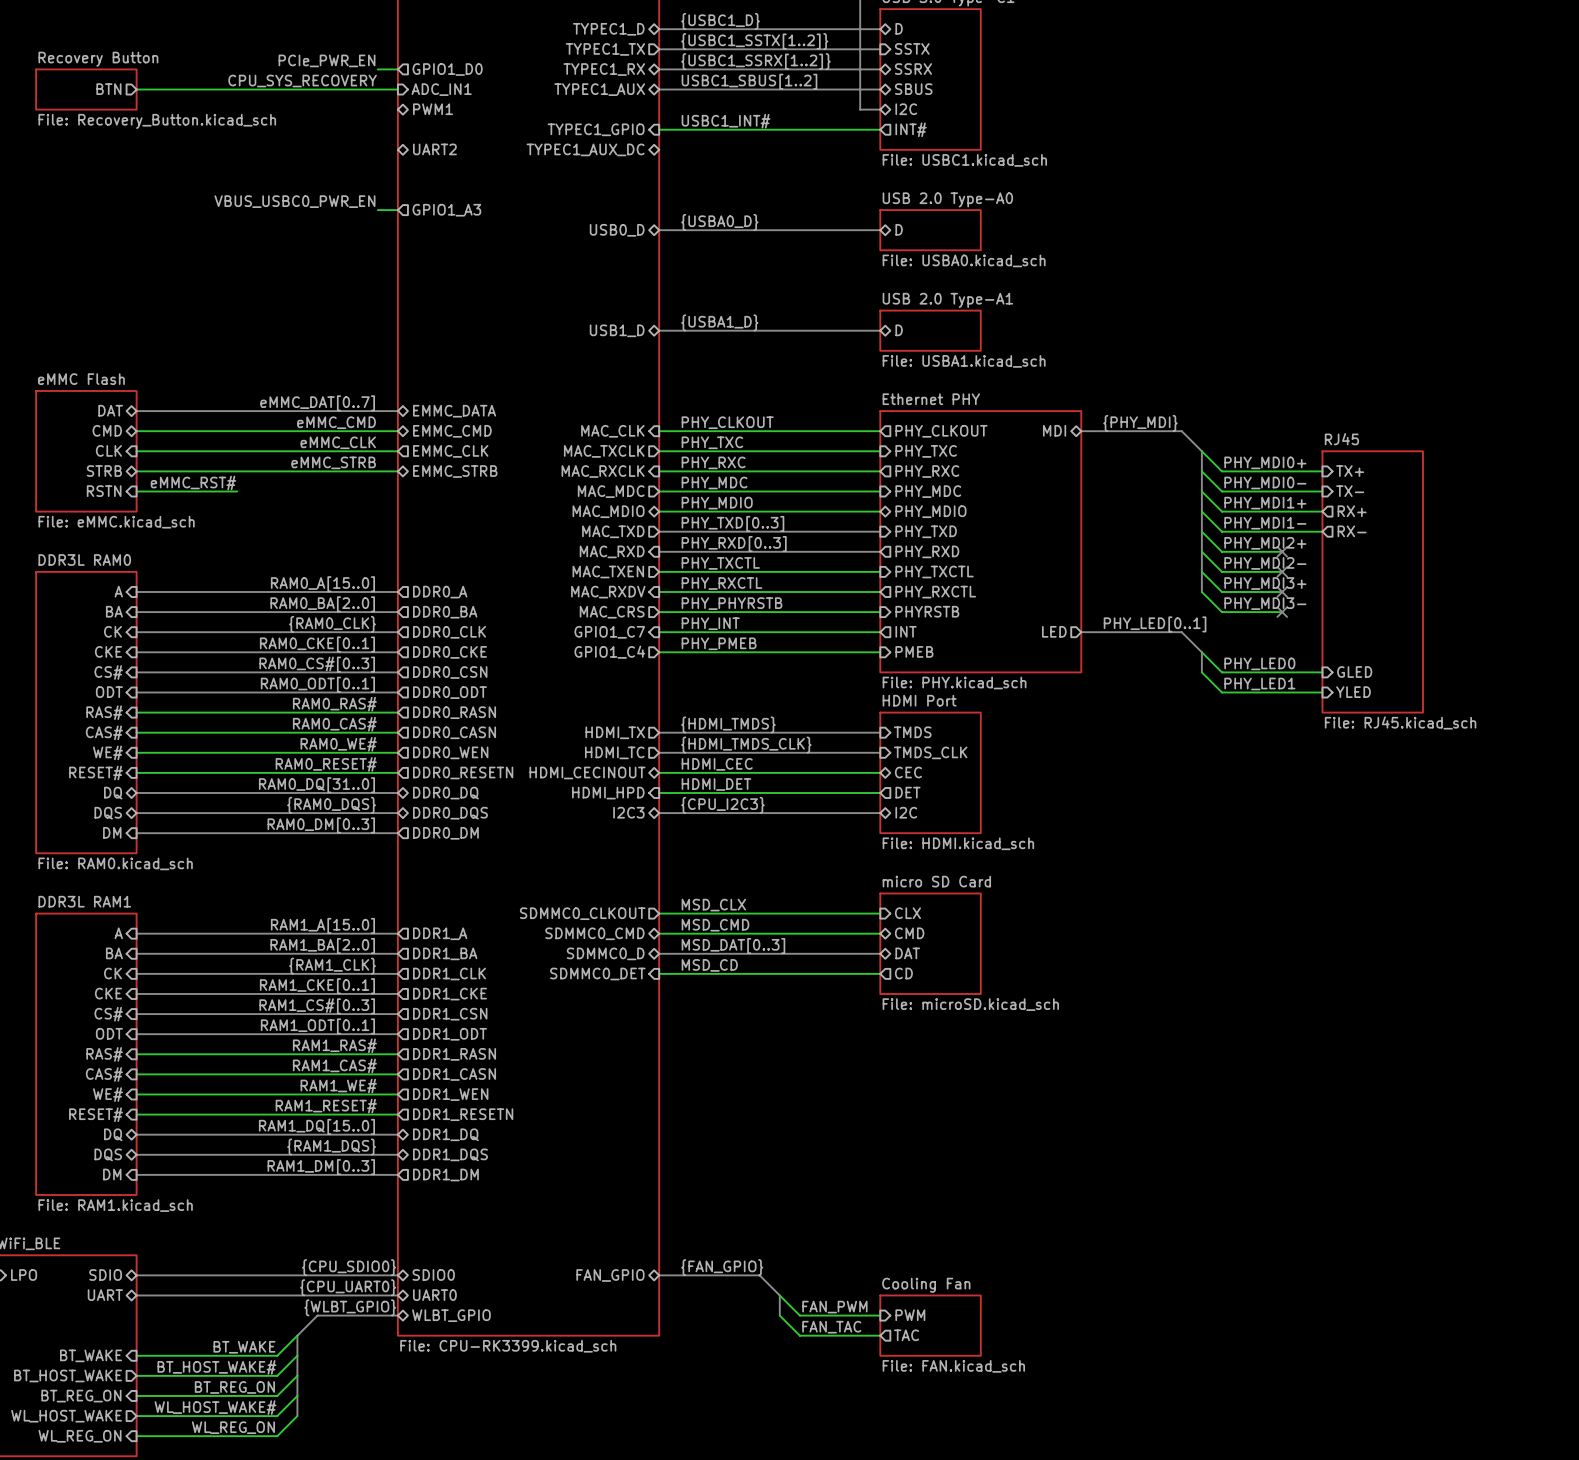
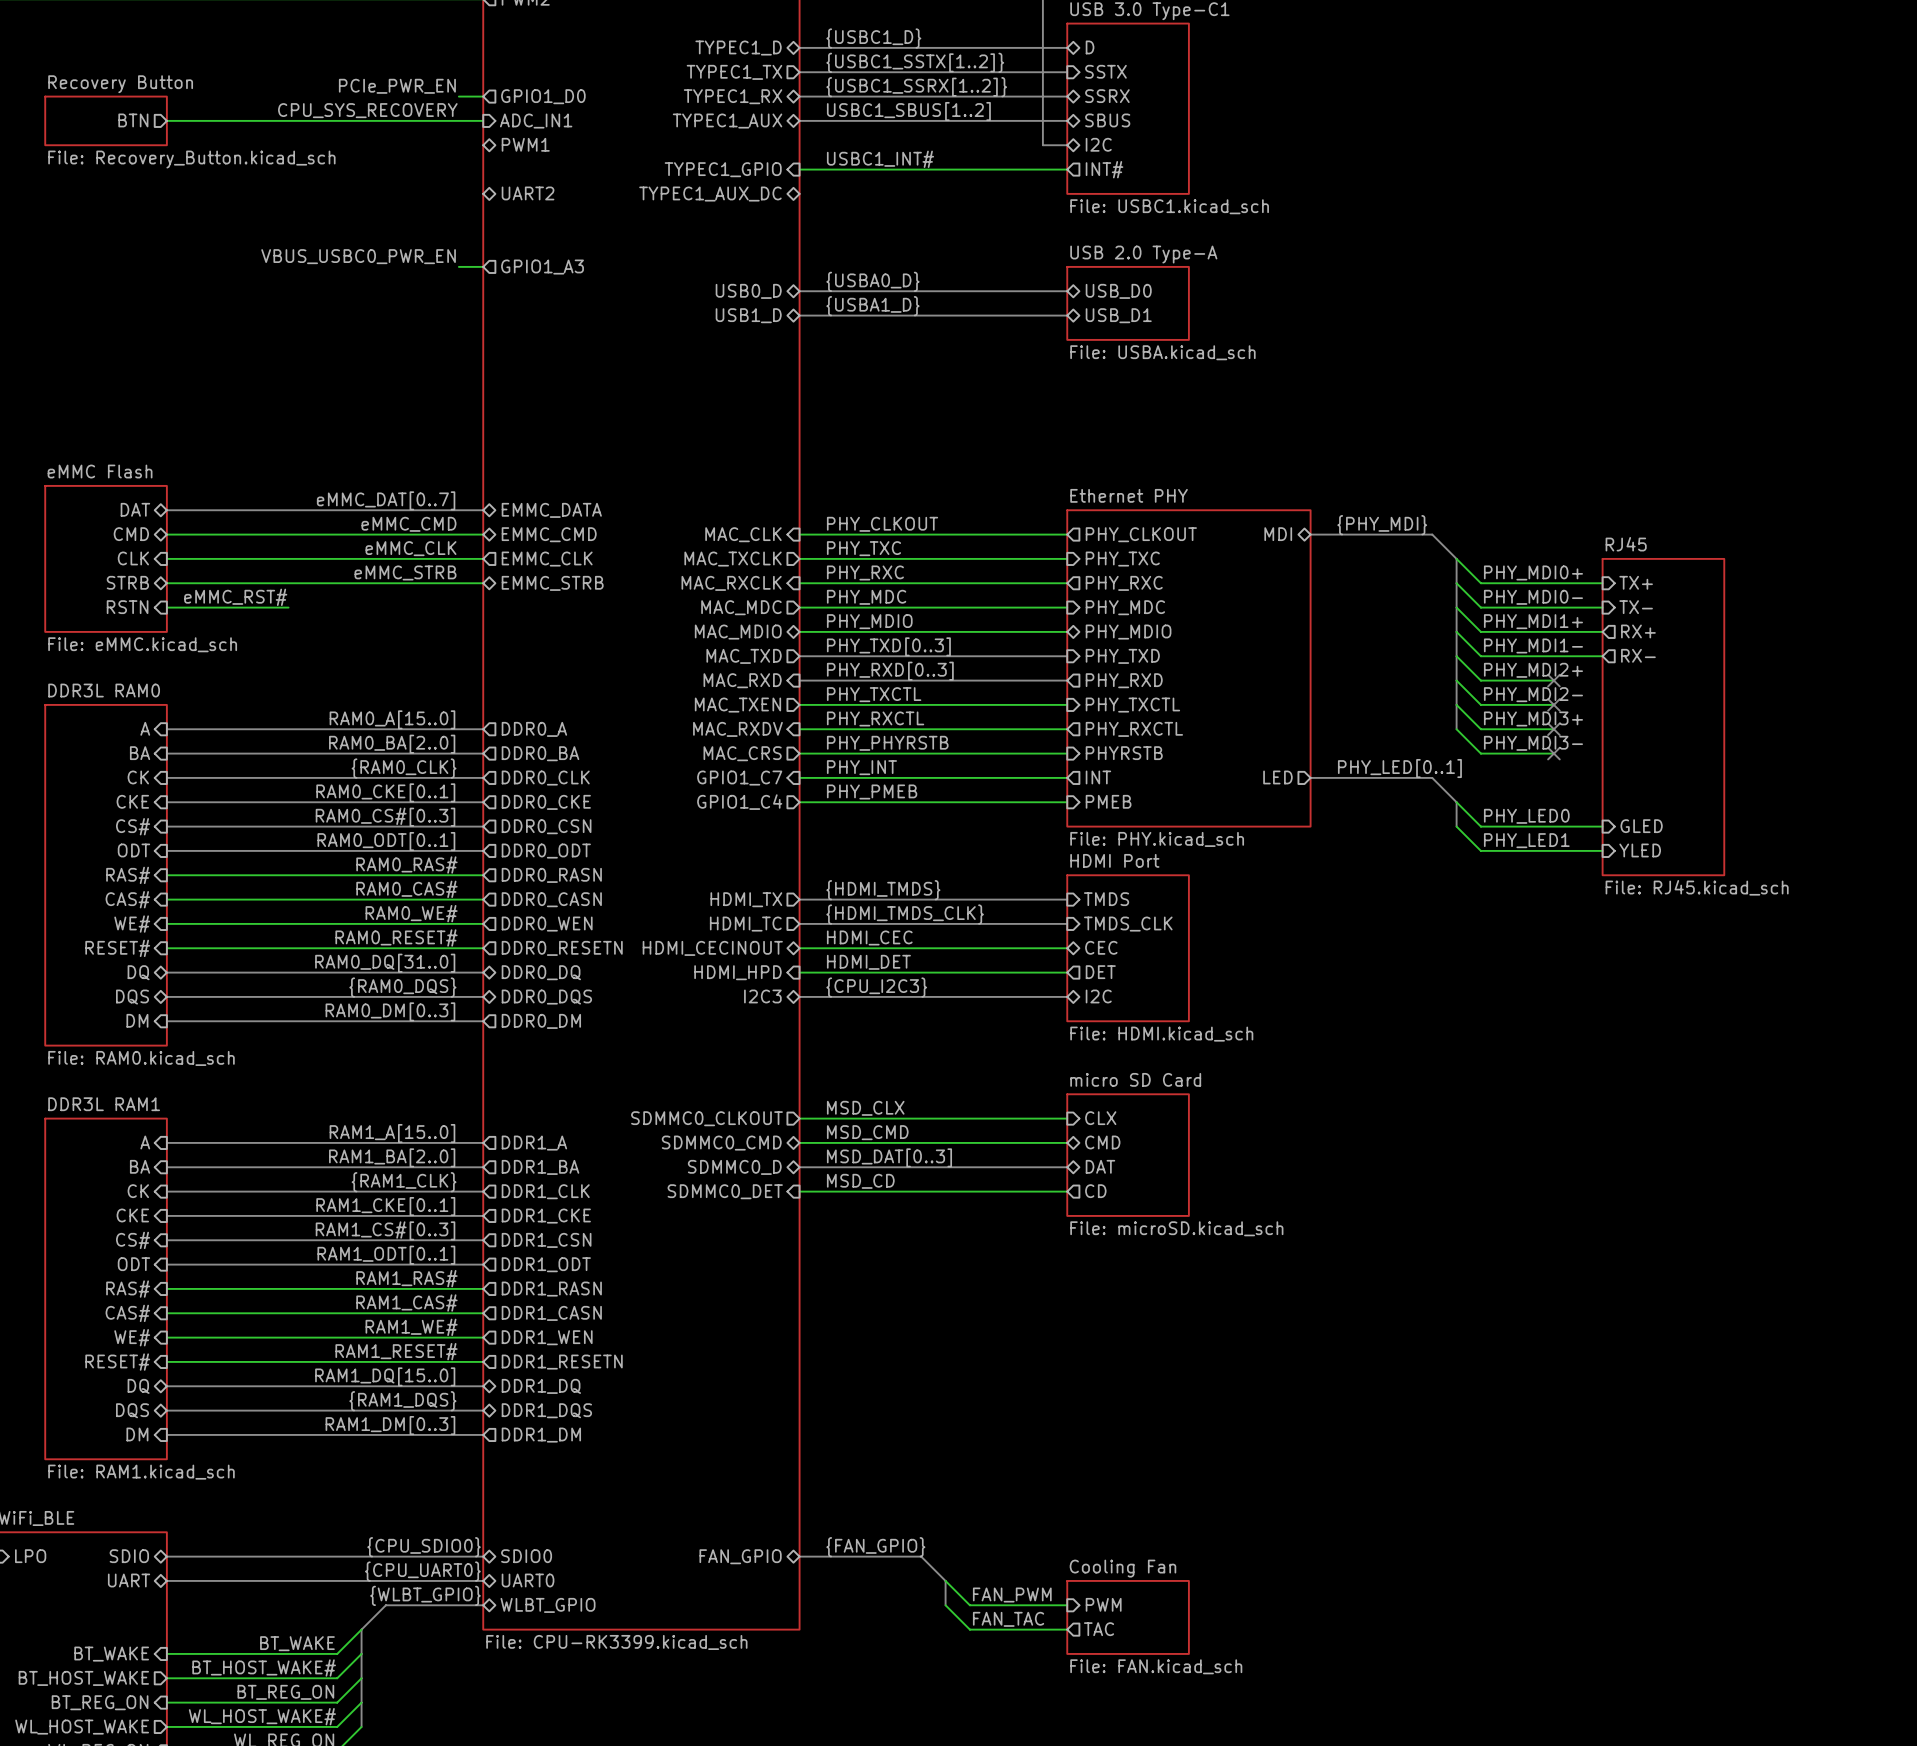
sheet pin: D (899, 229) -> USB_D0 (1118, 291)
sheet USB 2.0 Type-A0: File: USBA0.kicad_sch (930, 230) -> none
sheet USB 2.0 Type-A: none -> File: USBA.kicad_sch (1128, 303)
sheet pin: none -> USB_D1 (1118, 315)
label position: {USBA1_D} (719, 322) -> {USBA1_D} (872, 306)
sheet pin position: USB1_D (617, 330) -> USB1_D (748, 315)
bus: (659, 330) (880, 330) -> (799, 315) (1067, 315)
sheet pin: D (899, 330) -> none
sheet USB 2.0 Type-A1: File: USBA1.kicad_sch (930, 330) -> none

